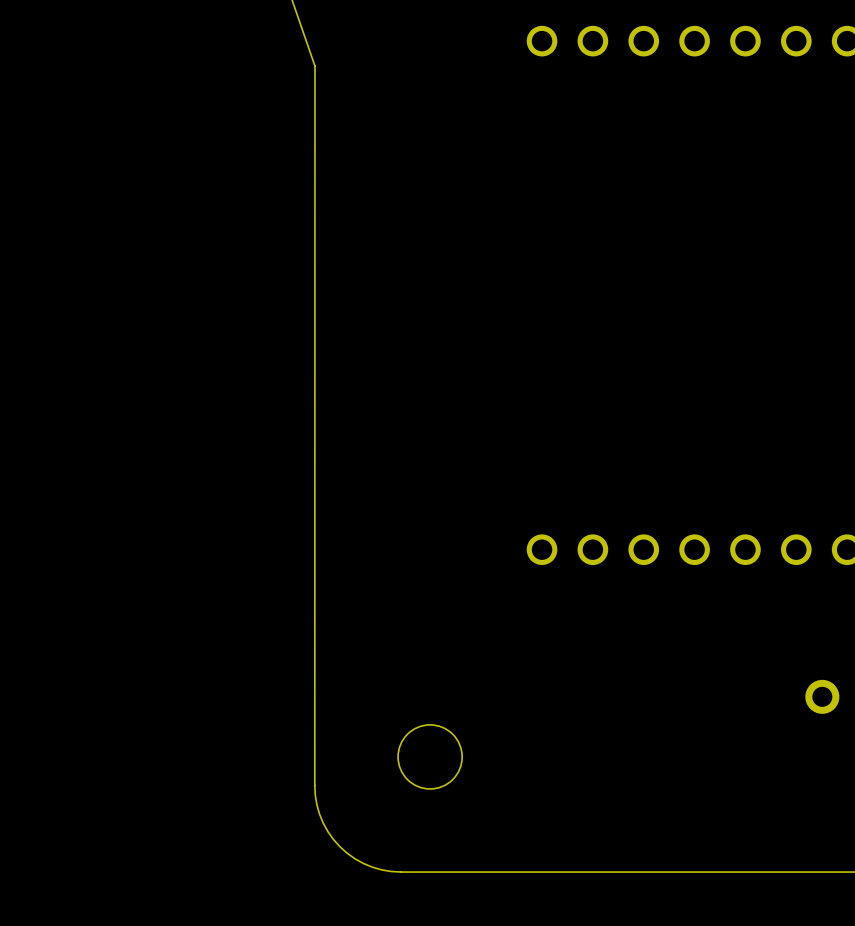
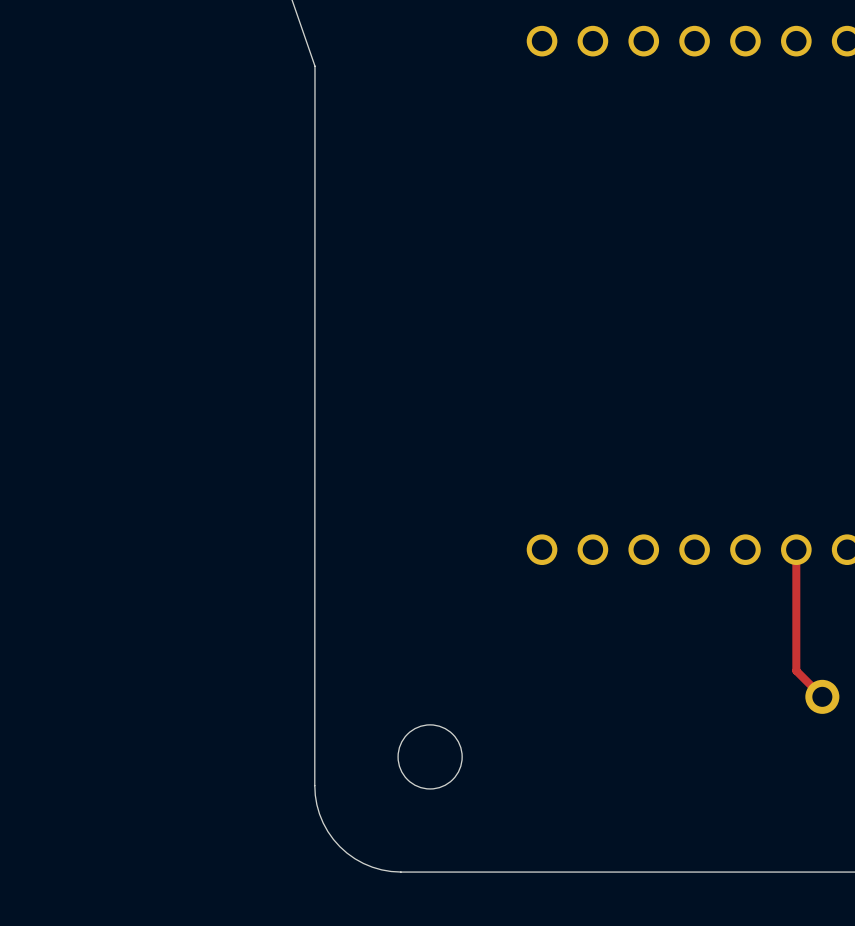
top track: none -> (796, 549) (796, 670) (822, 696)

